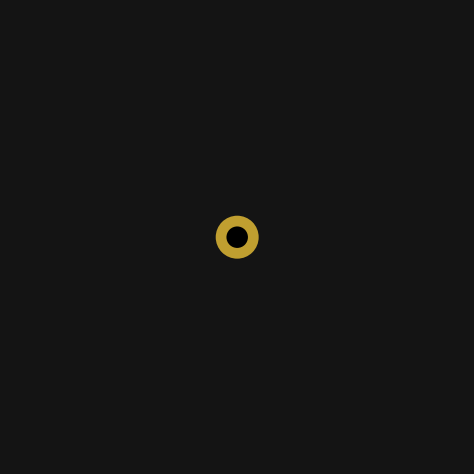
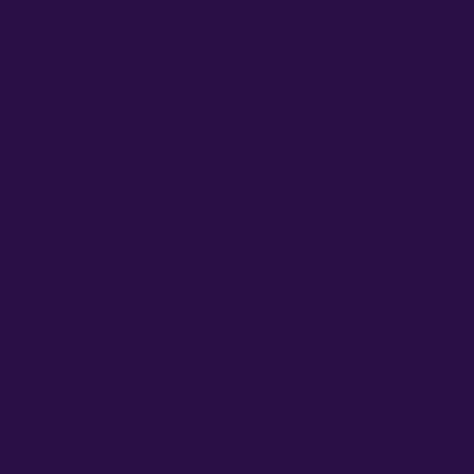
via: (237, 237) -> none

